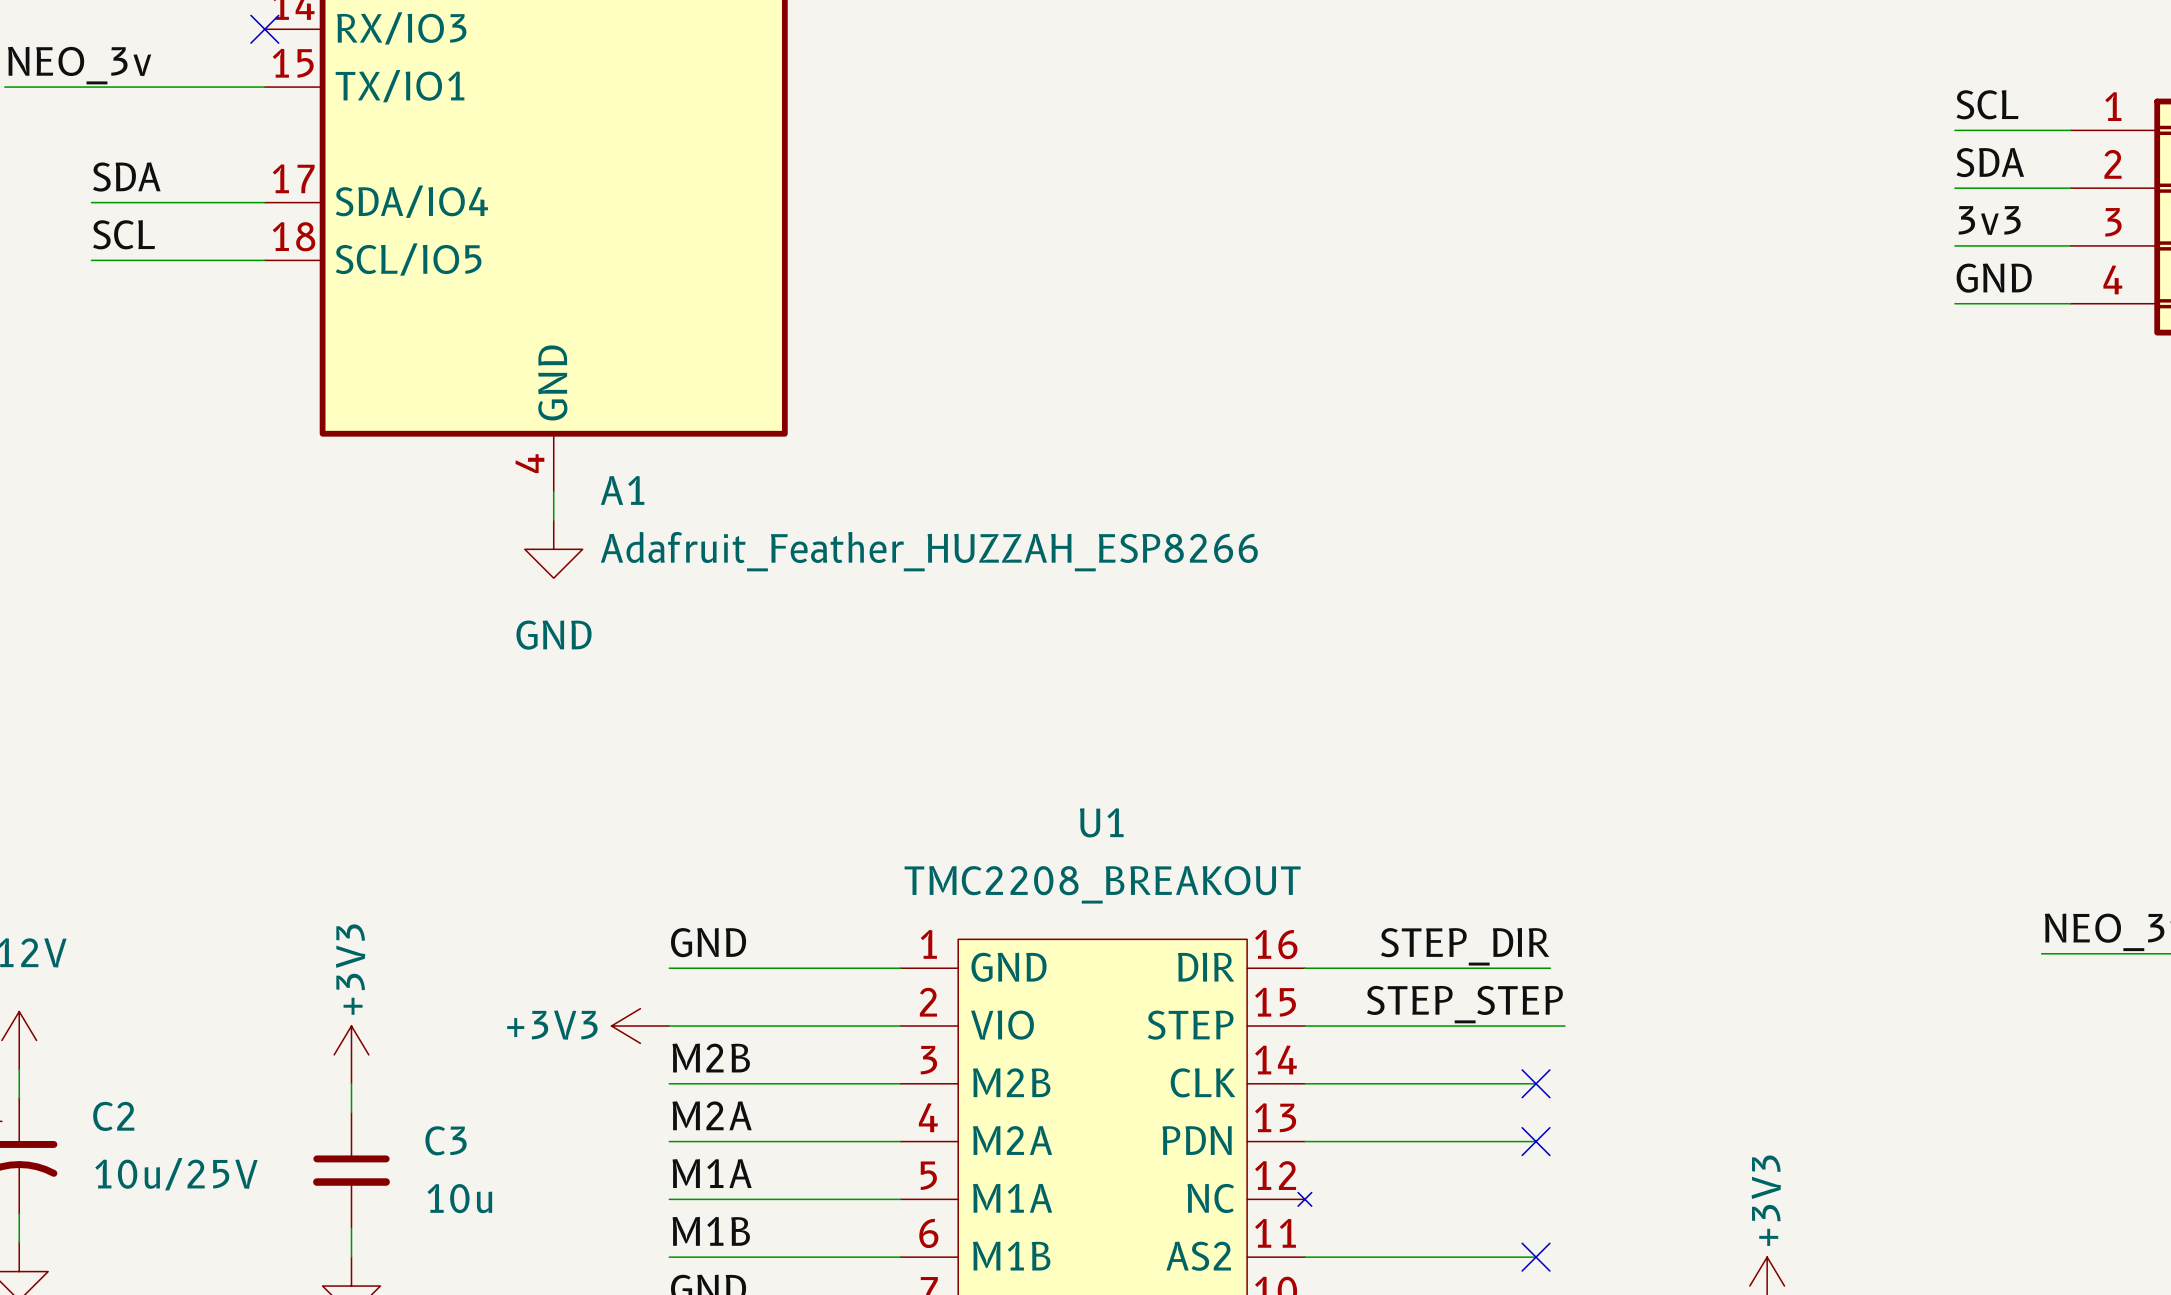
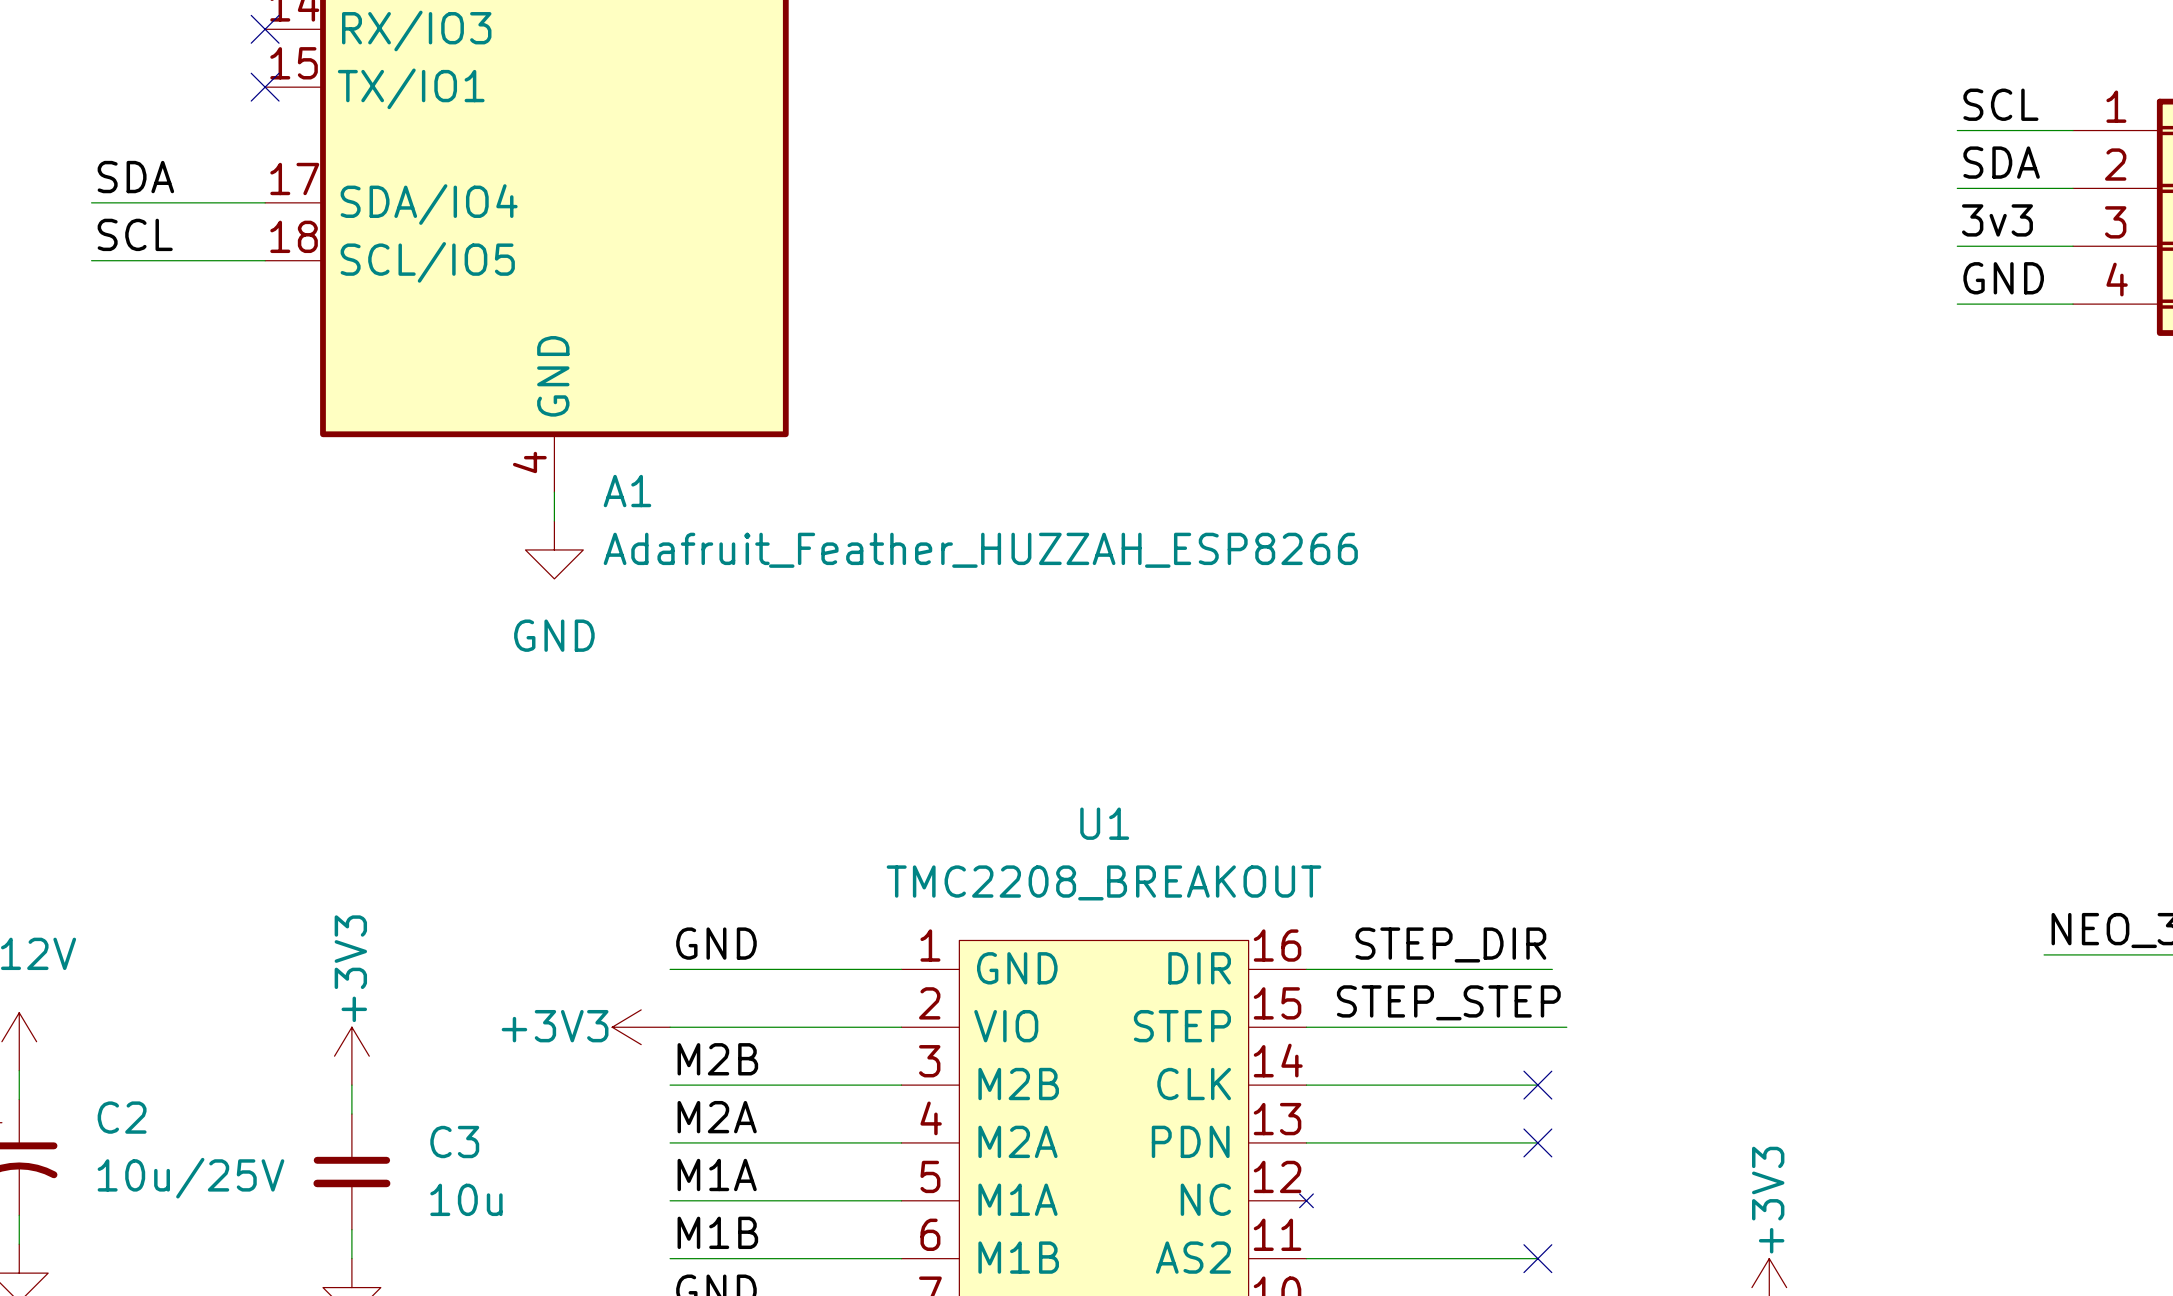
label: NEO_3v (79, 65) -> none
wire: (4, 87) (264, 87) -> none
no-connect mark: none -> (265, 87)

